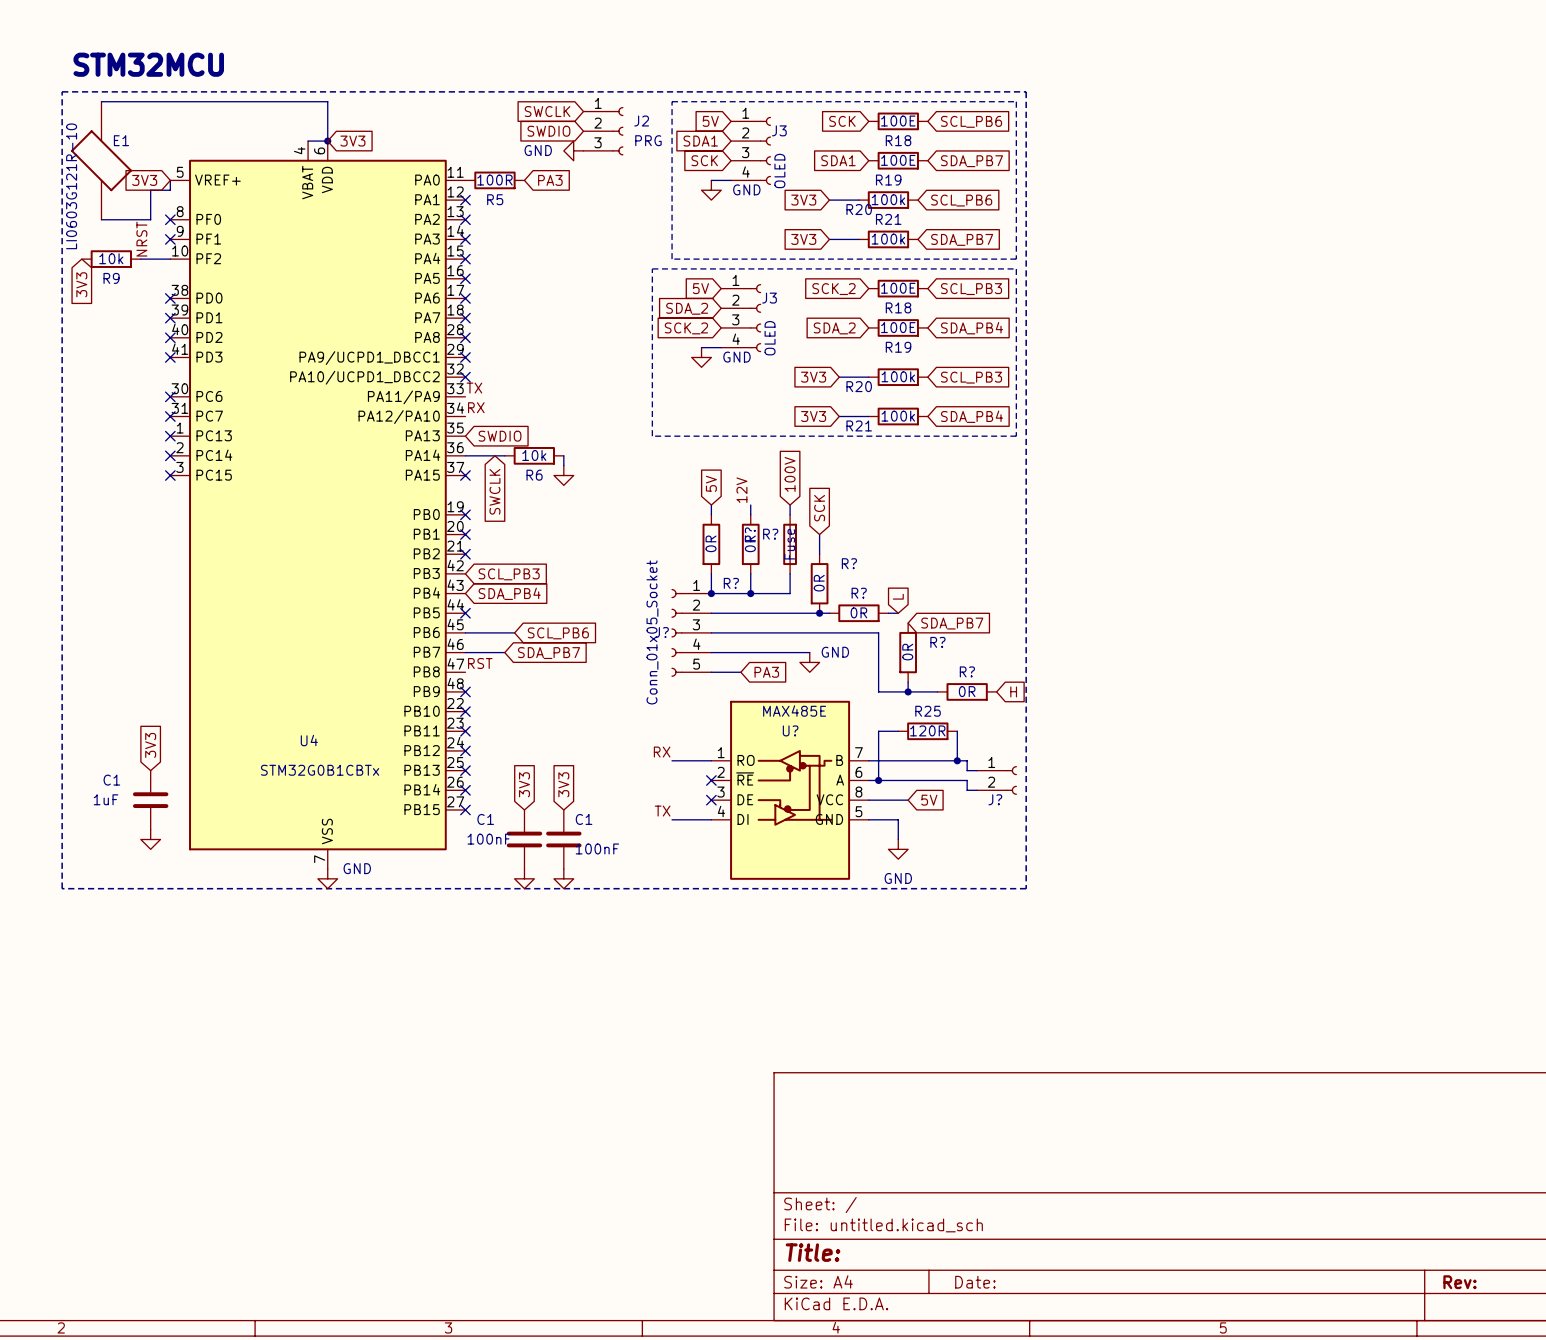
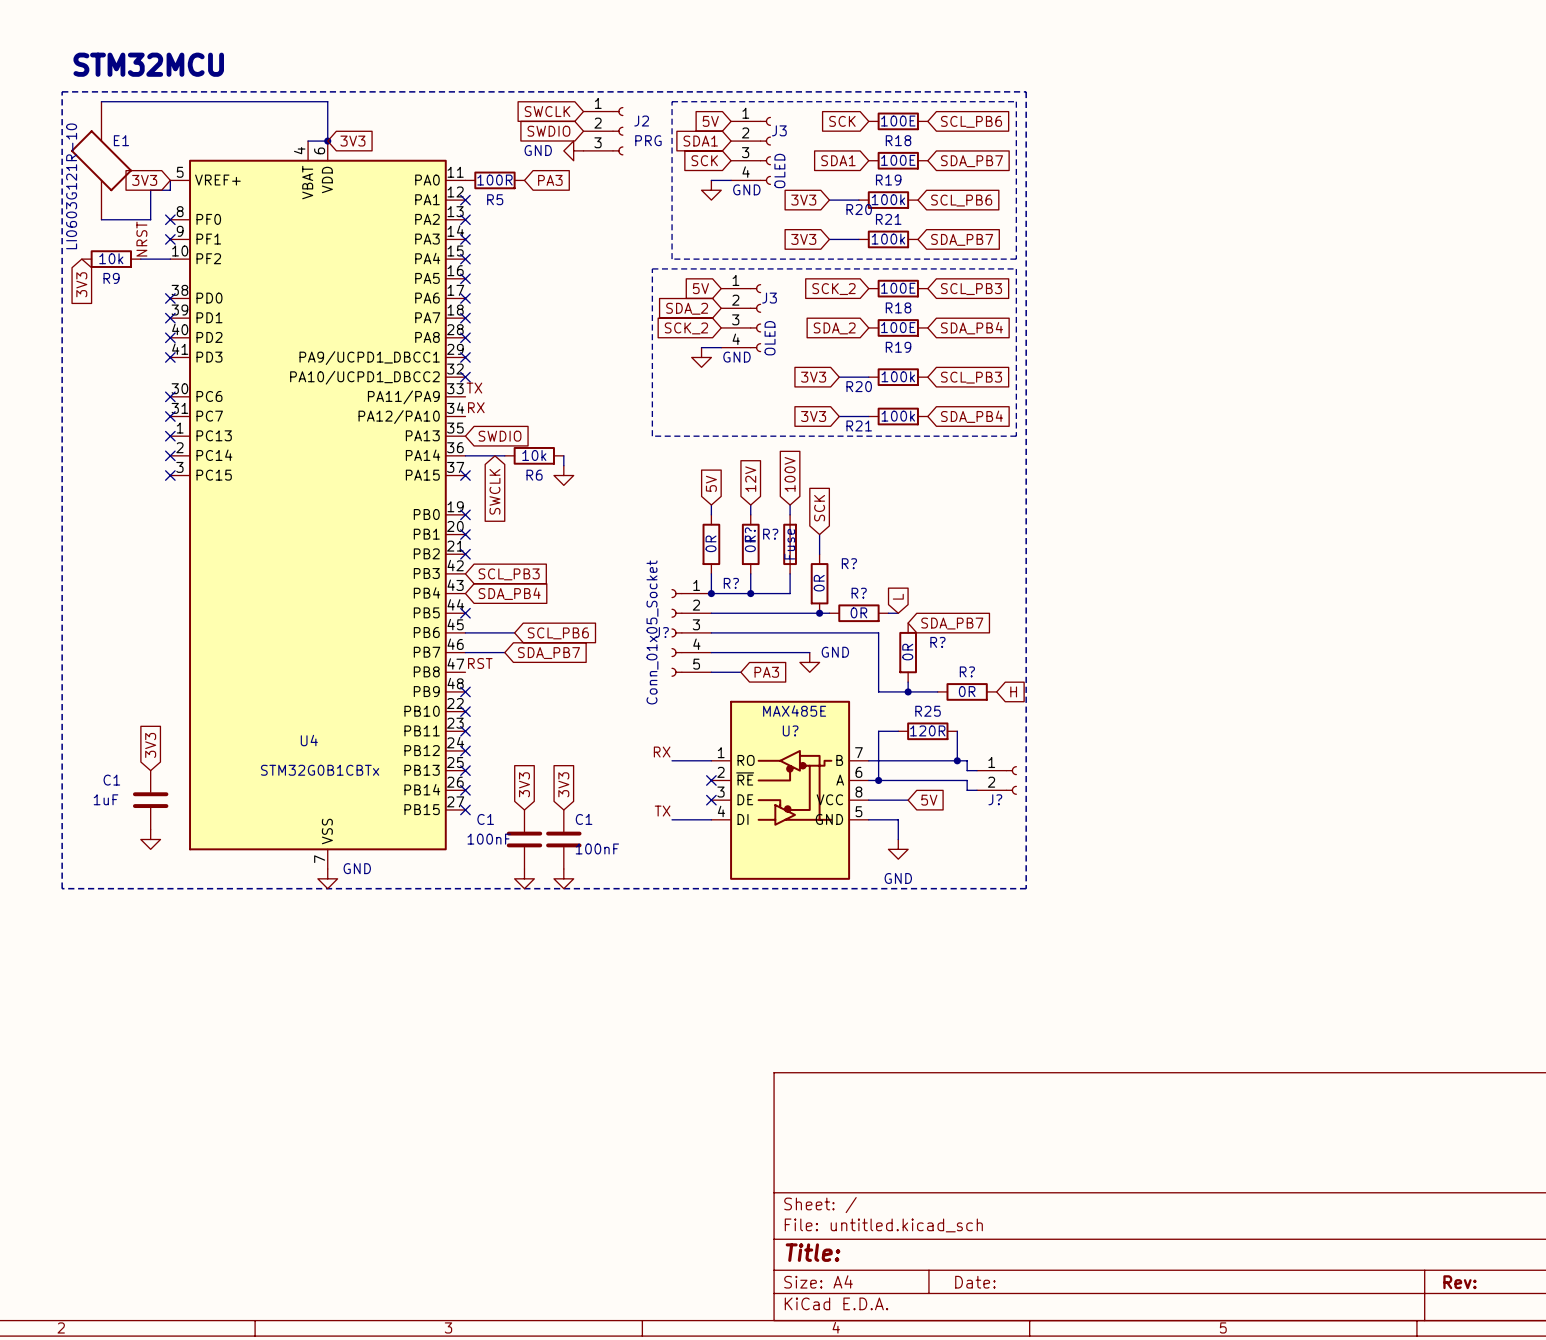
global label: none -> 12V (750, 479)
label: 12V (741, 490) -> none

